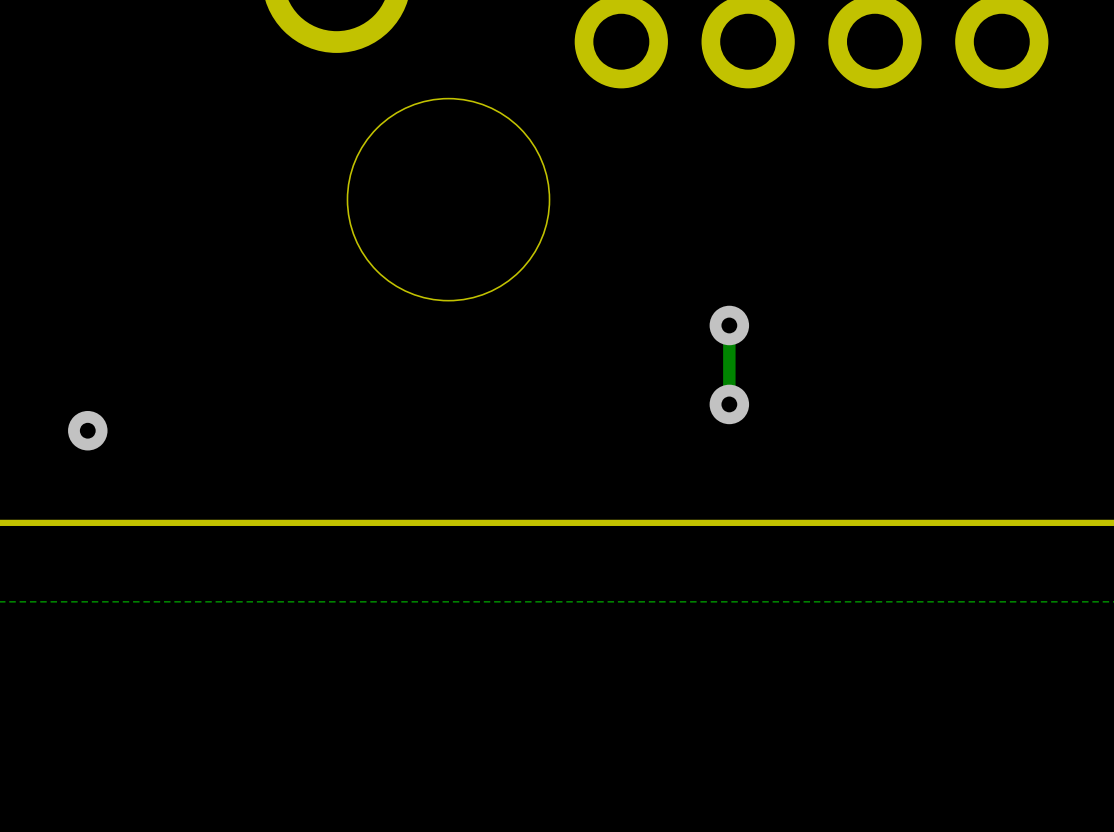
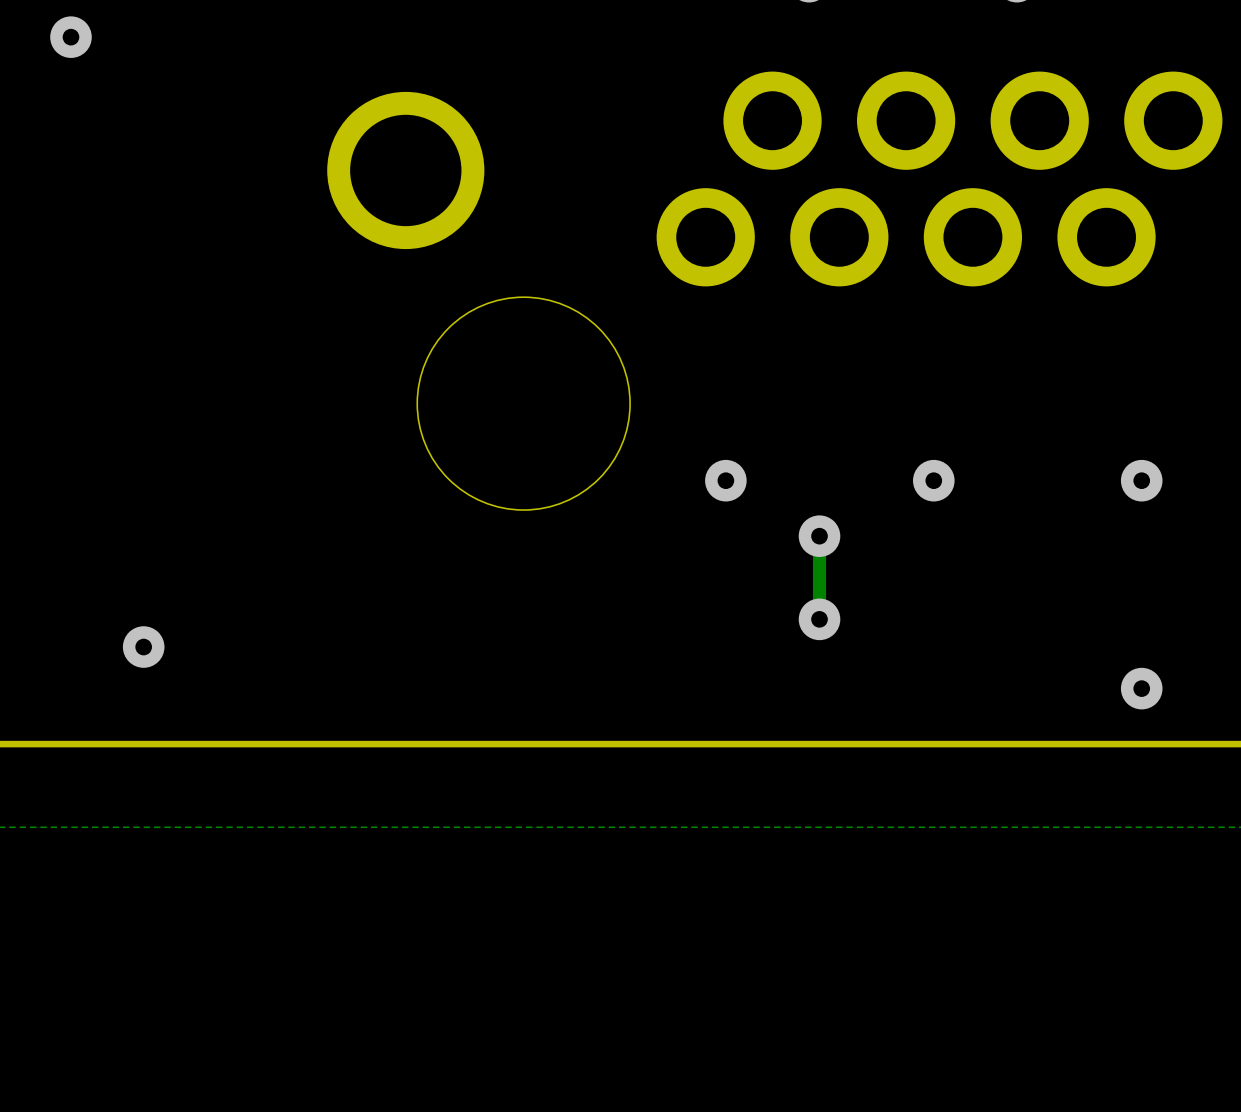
via: none -> (725, 480)
via: none -> (933, 480)
via: none -> (1141, 480)
via: none -> (1141, 688)

